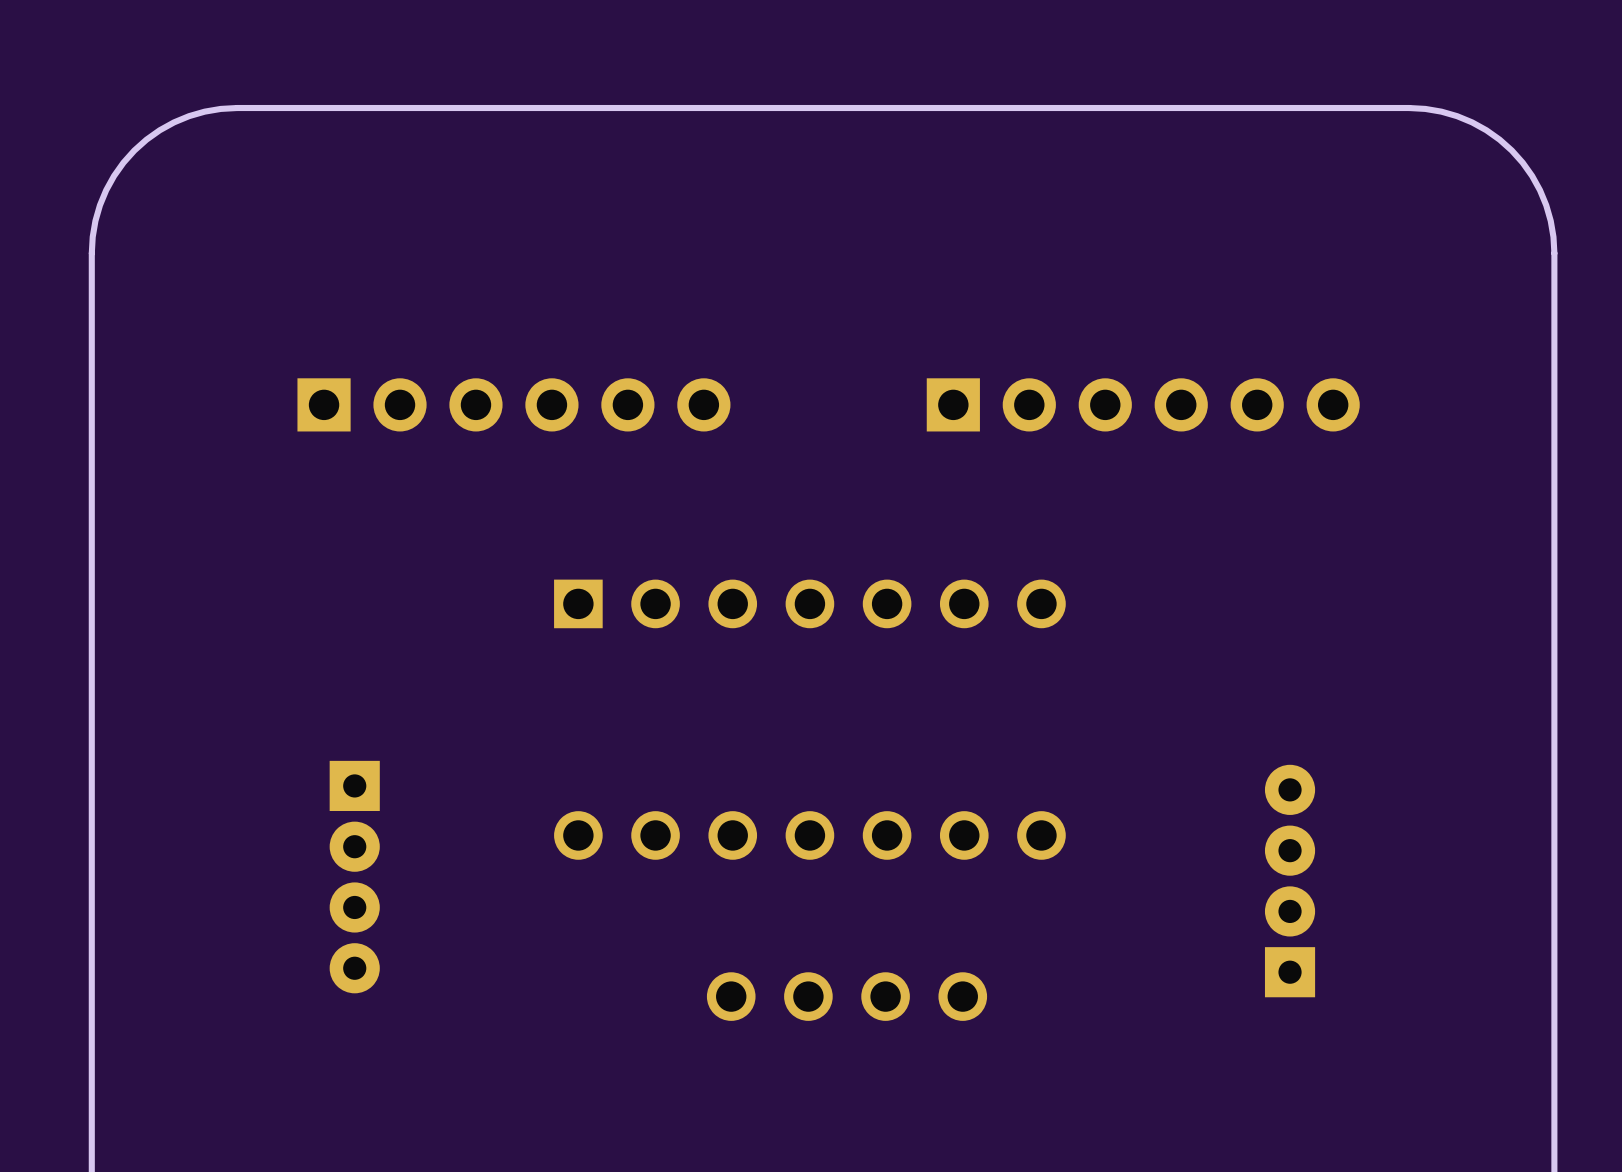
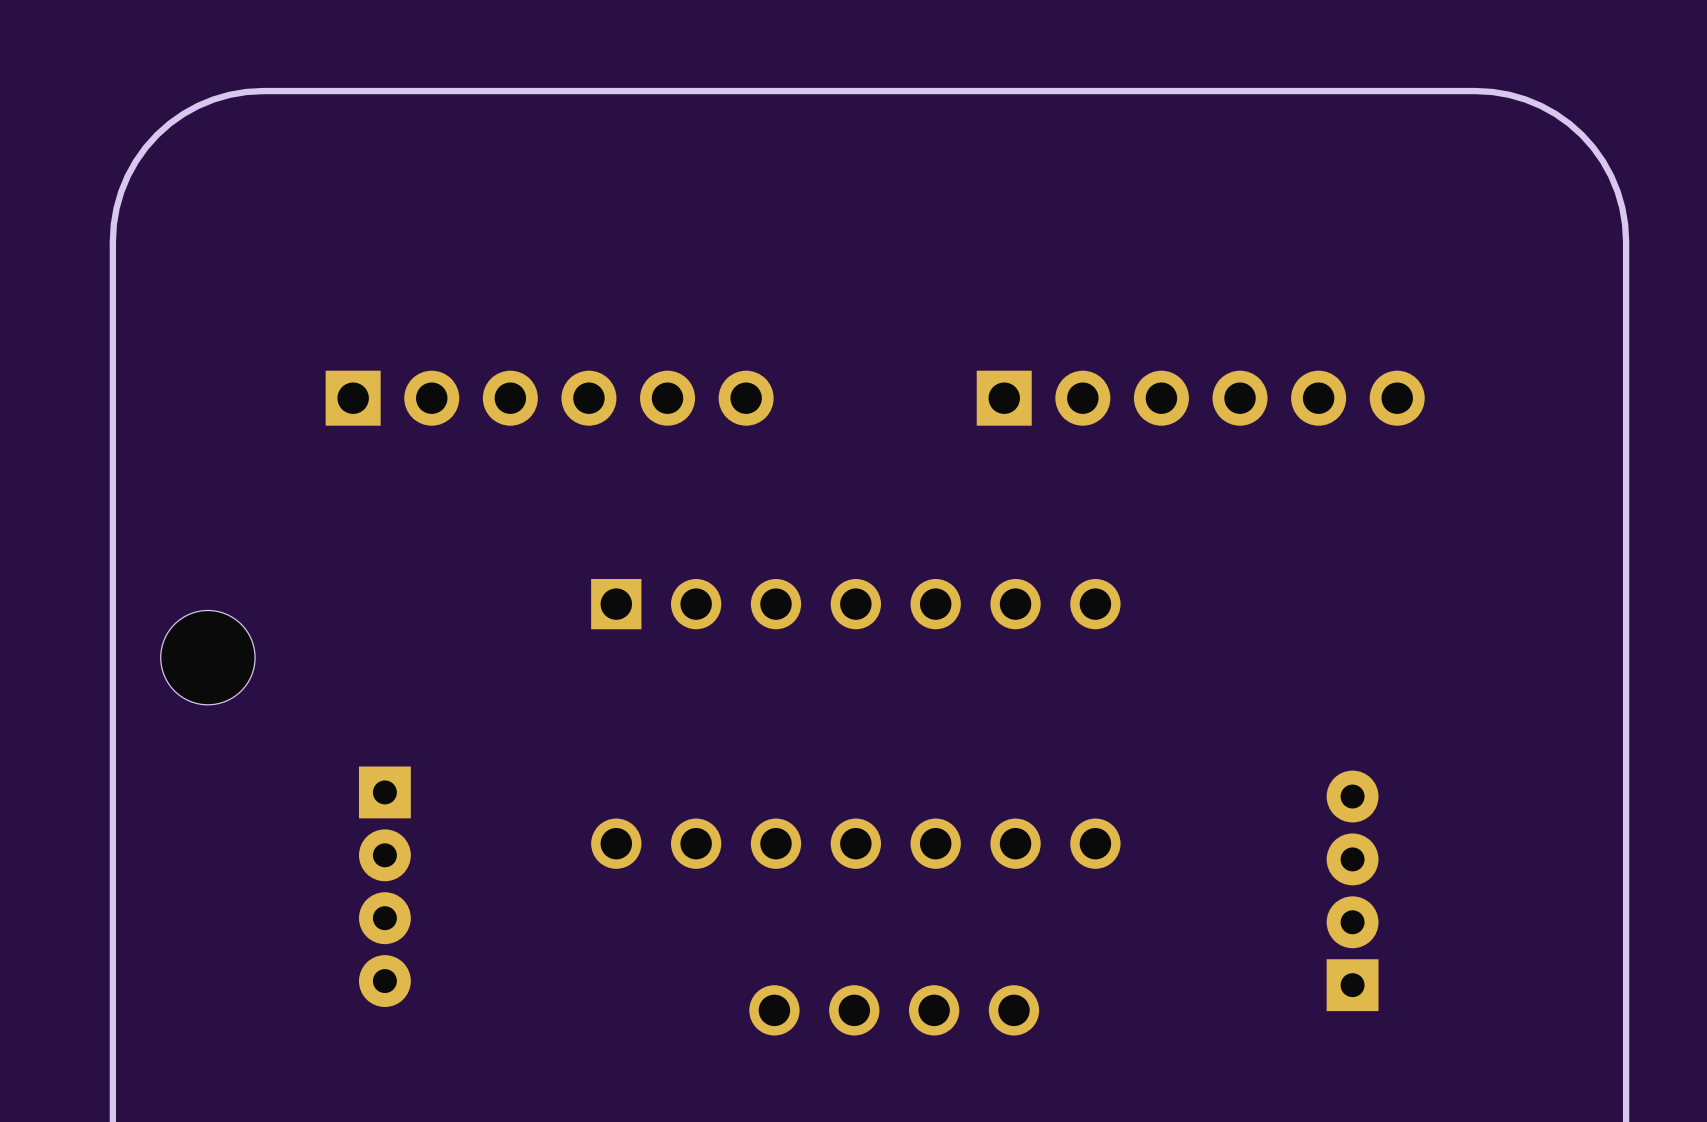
part: none -> (207, 657)

